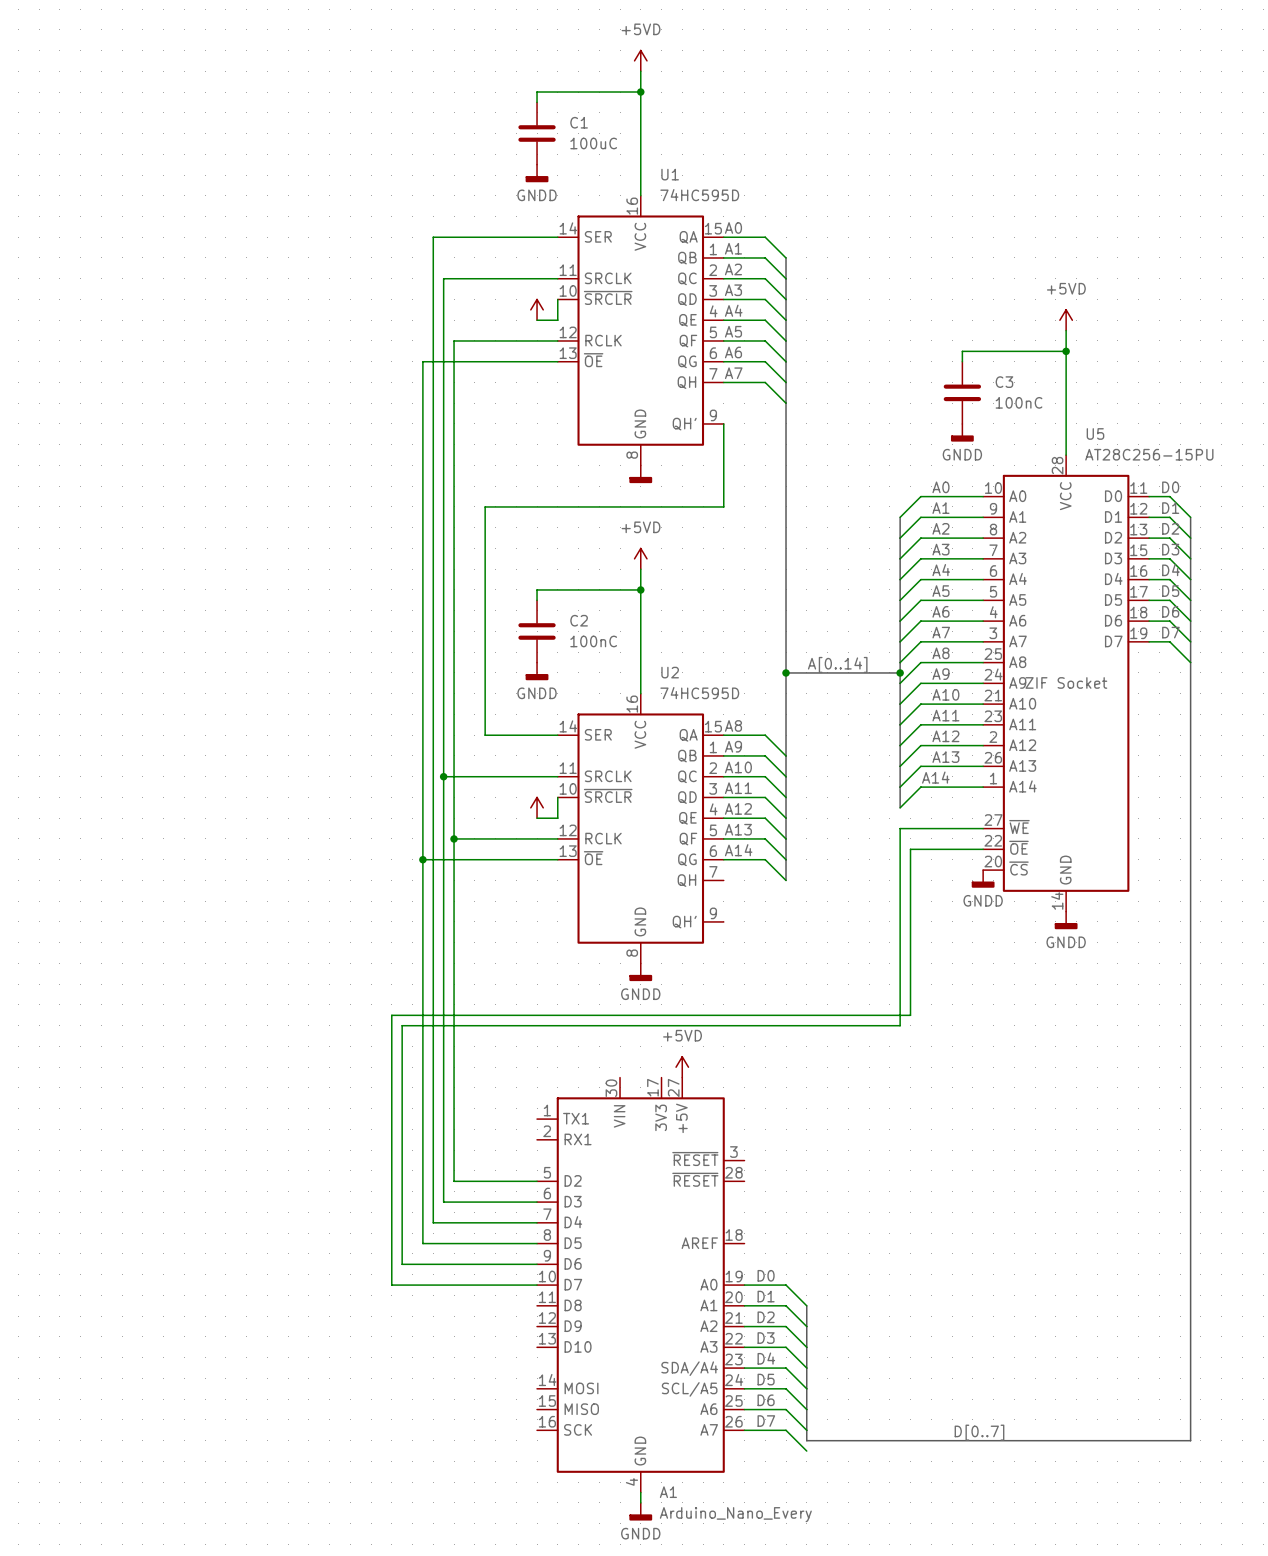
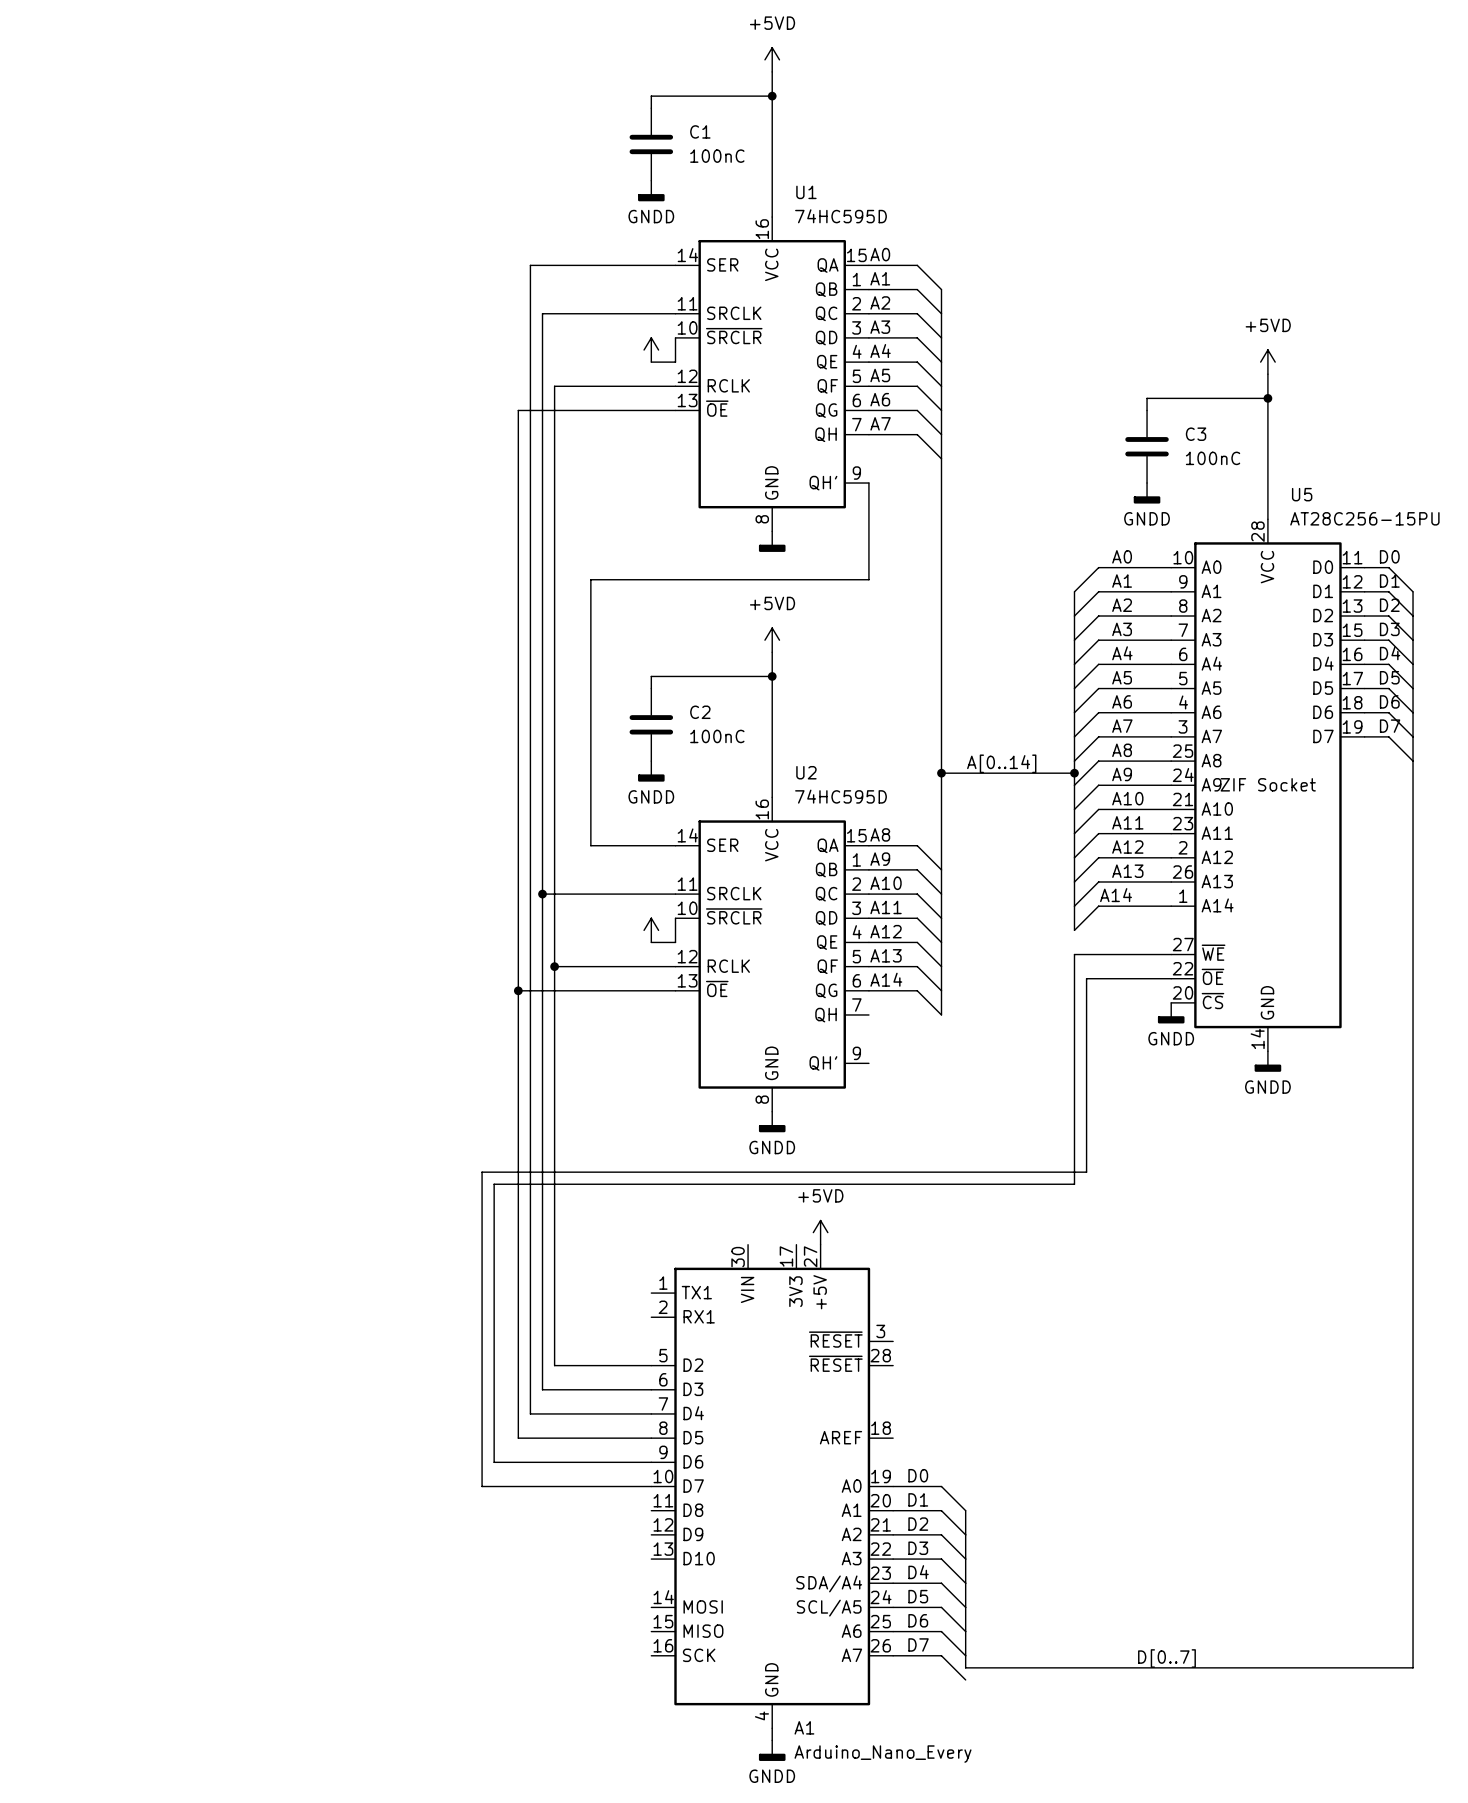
C1 value: 100uC (593, 143) -> 100nC (717, 156)

